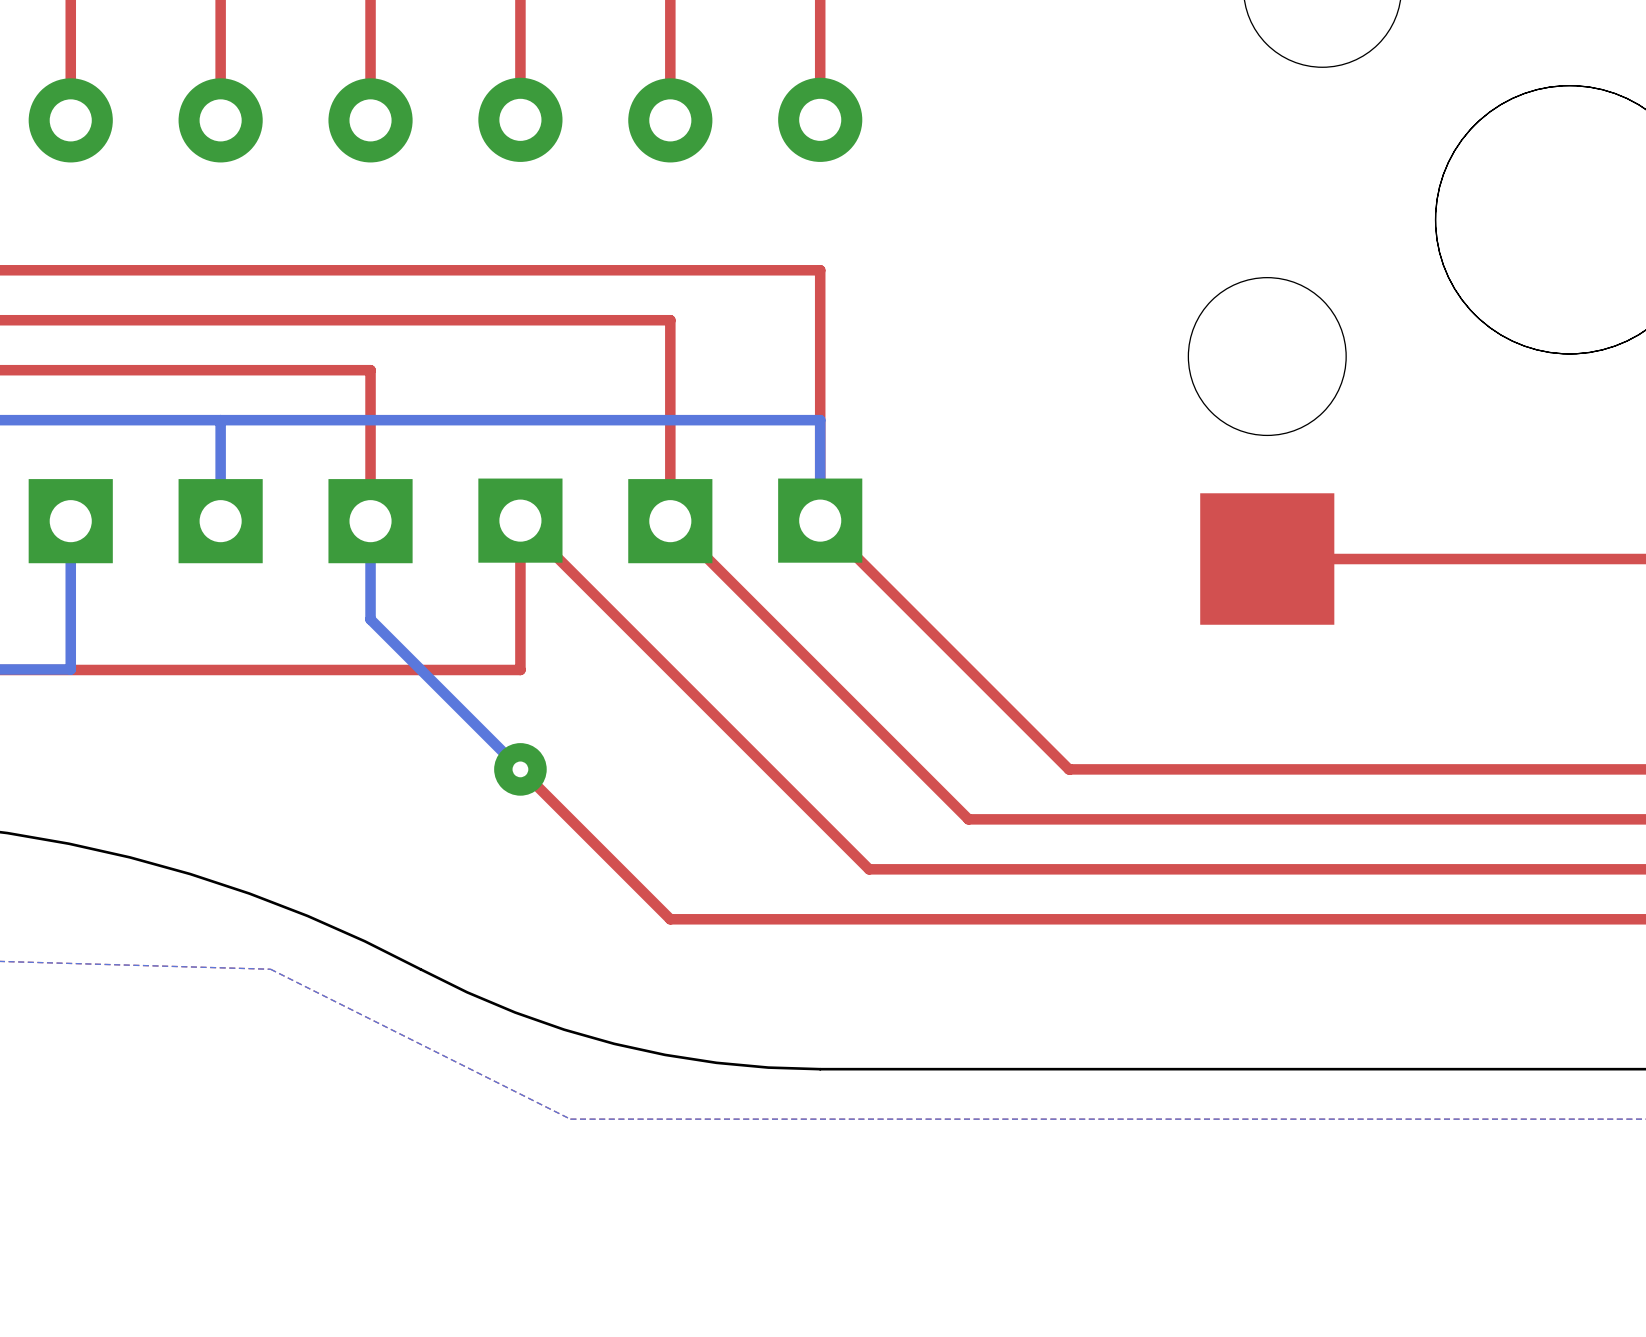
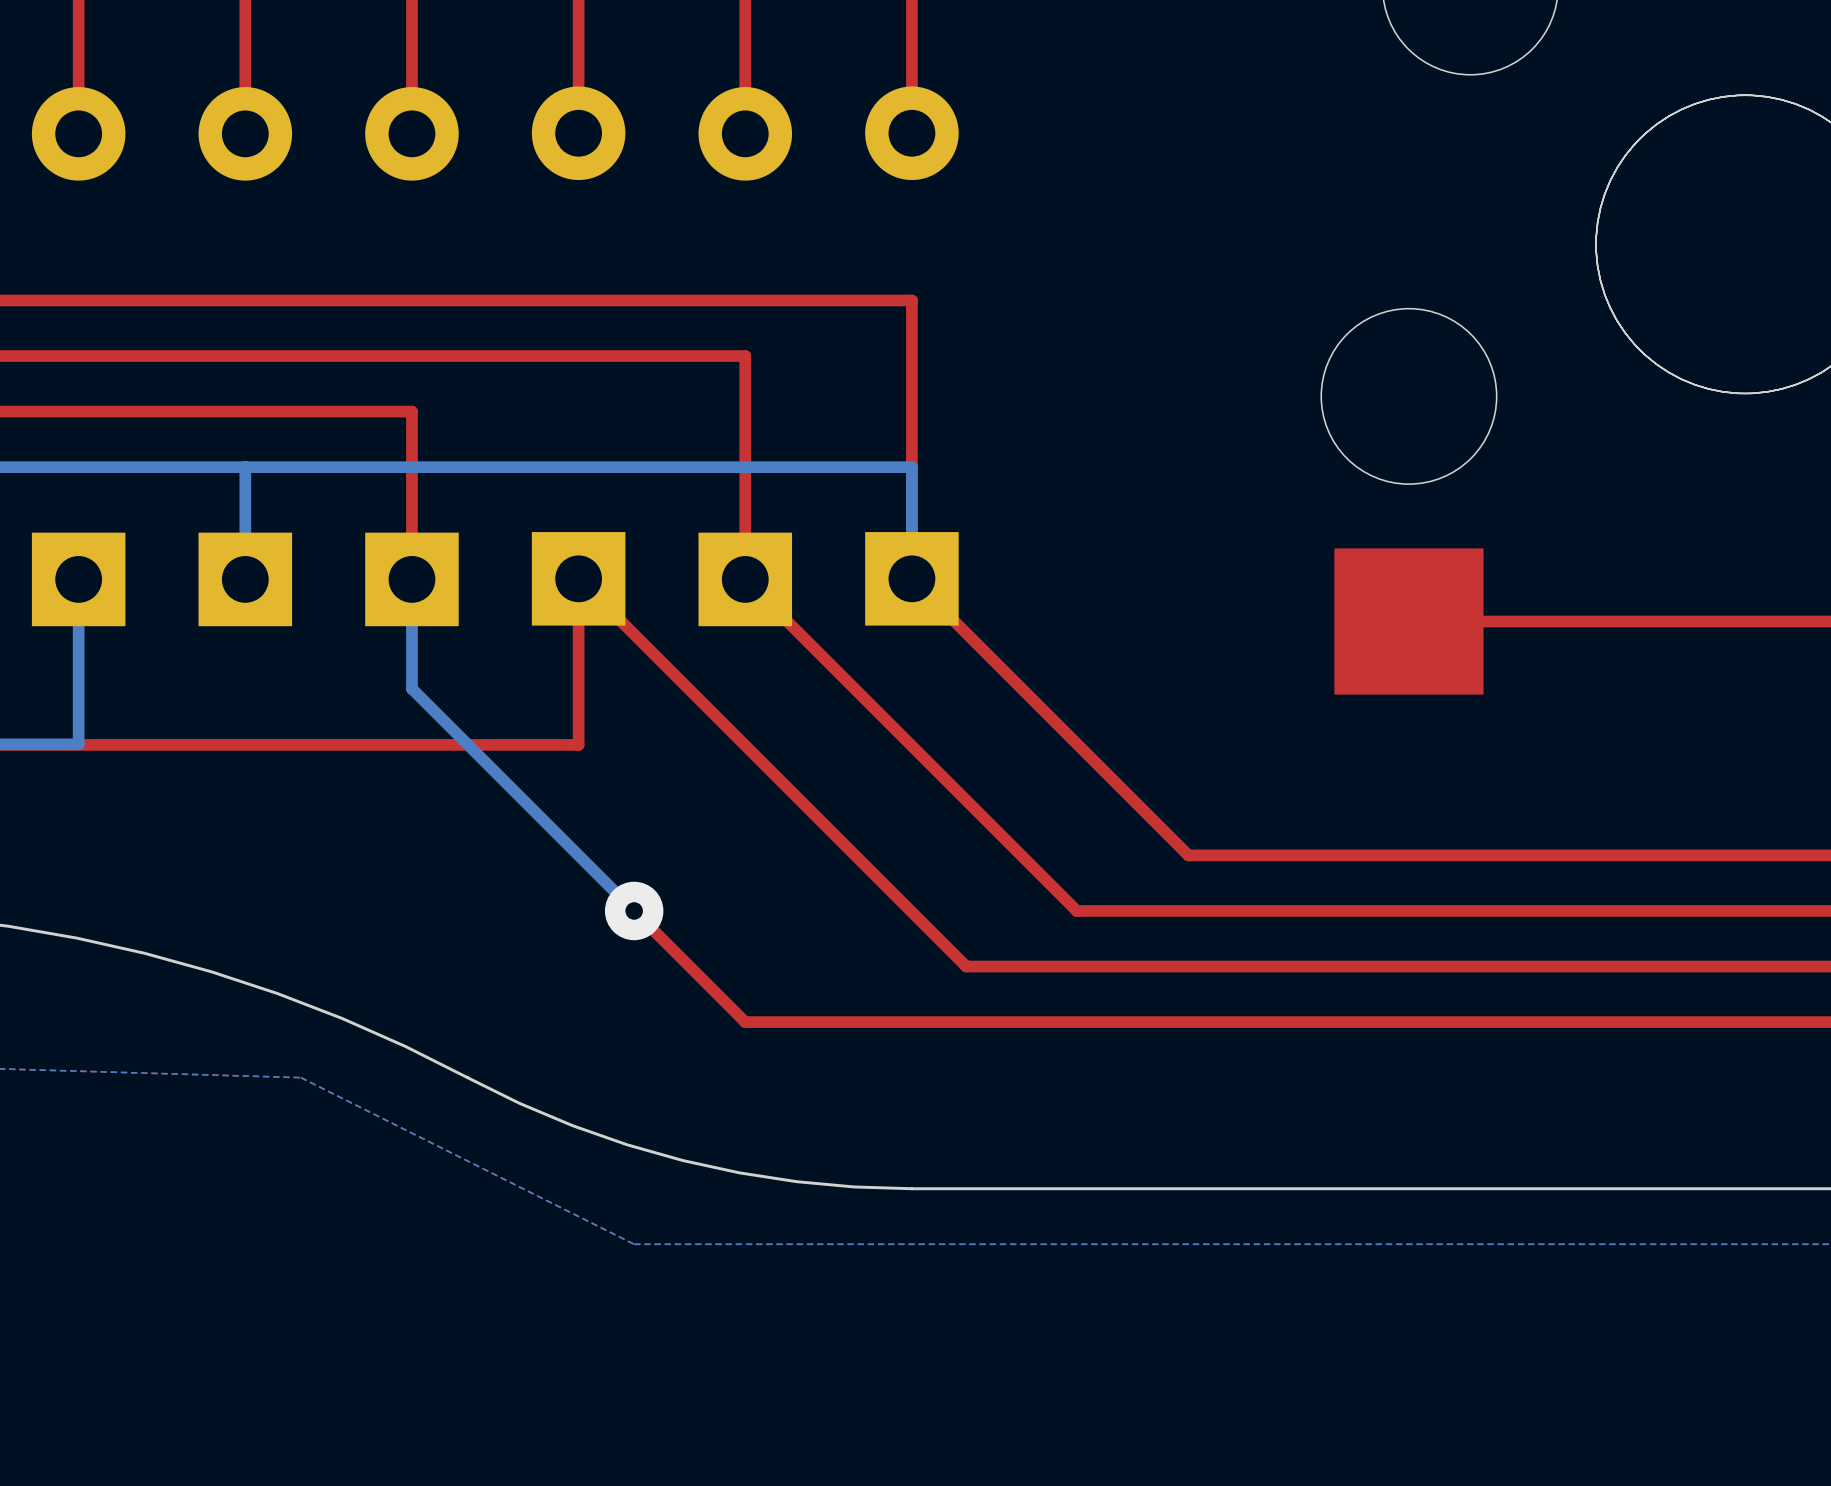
top track: (520, 769) (570, 819) -> none
bottom track: none -> (578, 855) (634, 910)
via position: (520, 769) -> (634, 910)

